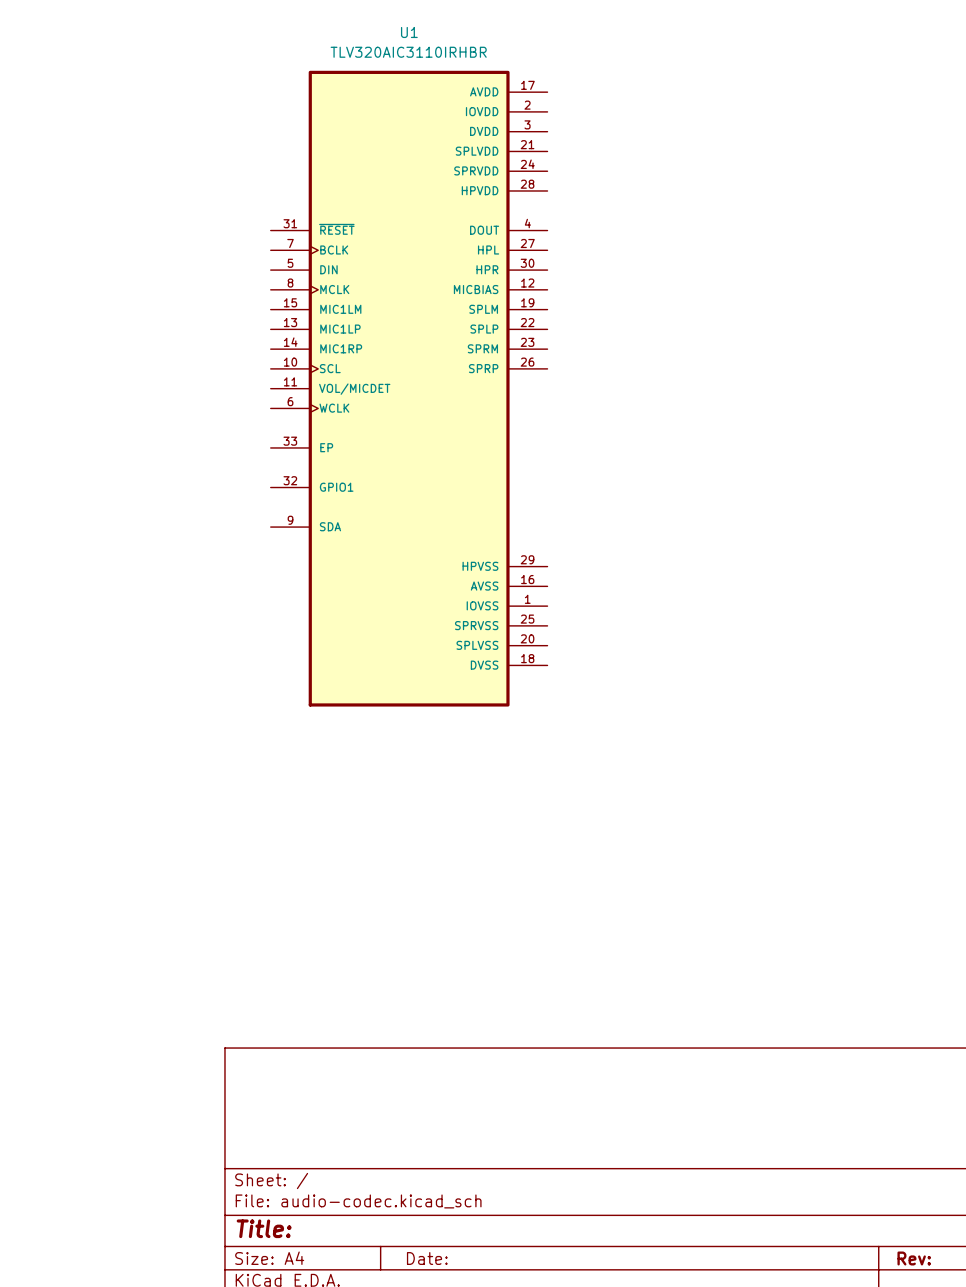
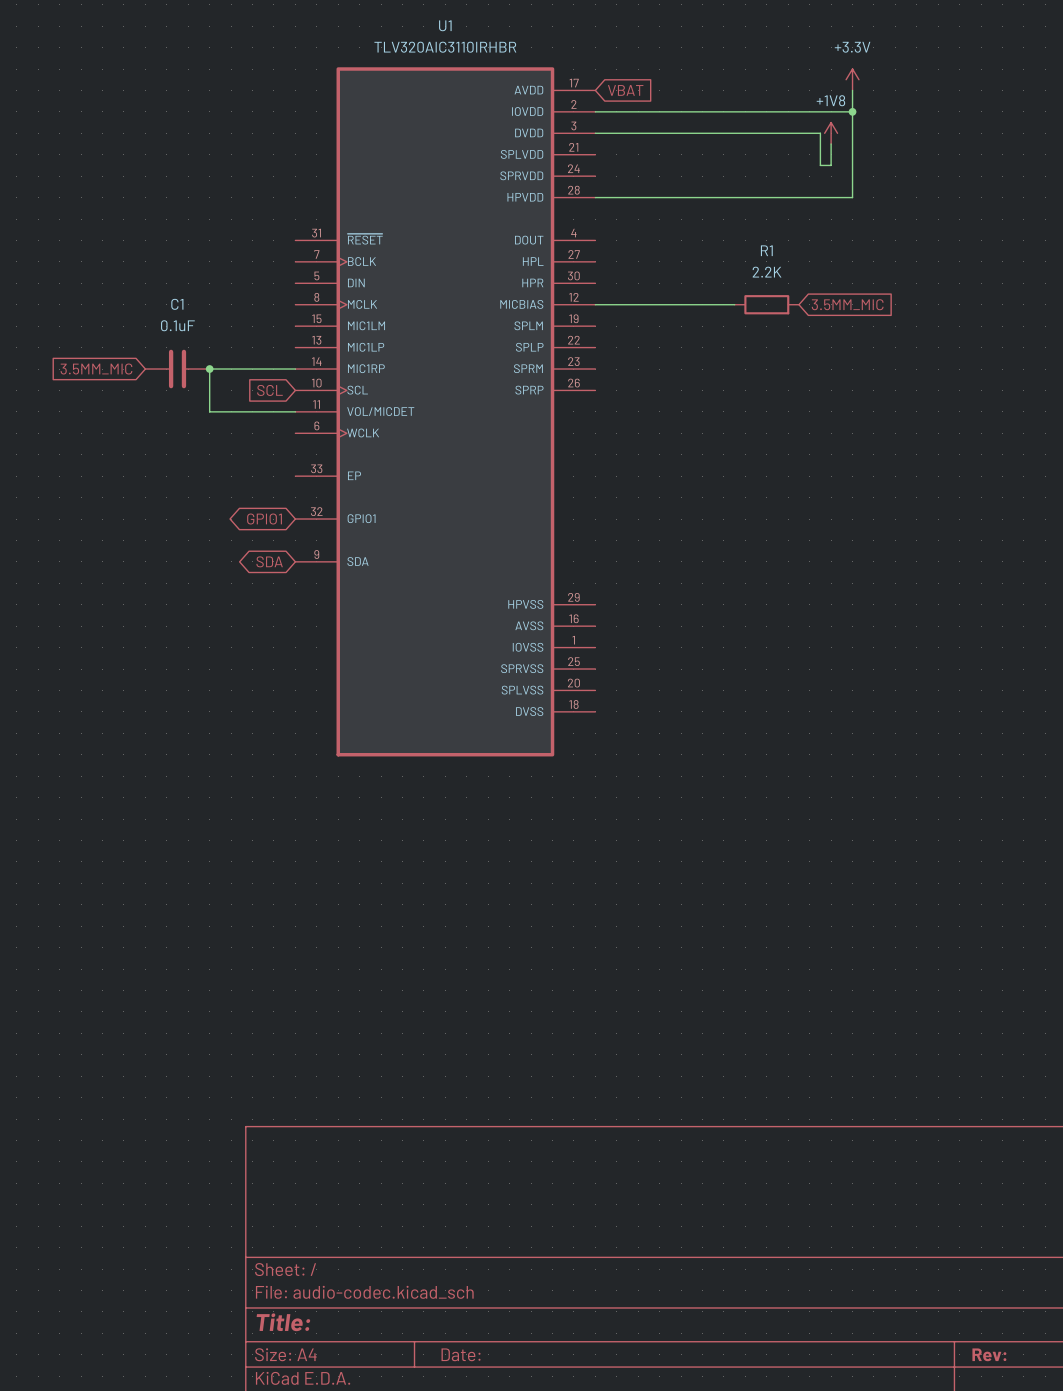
power symbol: none -> +3.3V (852, 79)
global label: none -> VBAT (625, 90)
wire: none -> (852, 90) (852, 197) (595, 197)
wire: none -> (595, 111) (852, 111)
junction: none -> (852, 111)
wire: none -> (595, 133) (820, 133) (820, 165) (831, 165) (831, 144)
power symbol: none -> +1V8 (831, 133)
wire: none -> (595, 304) (734, 304)
R1: none -> 2.2K (766, 304)
global label: none -> 3.5MM_MIC (847, 304)
global label: none -> 3.5MM_MIC (96, 369)
C1: none -> 0.1uF (177, 369)
junction: none -> (209, 369)
wire: none -> (295, 369) (209, 369) (209, 411) (295, 411)
global label: none -> SCL (270, 390)
global label: none -> GPIO1 (264, 519)
global label: none -> SDA (269, 561)

